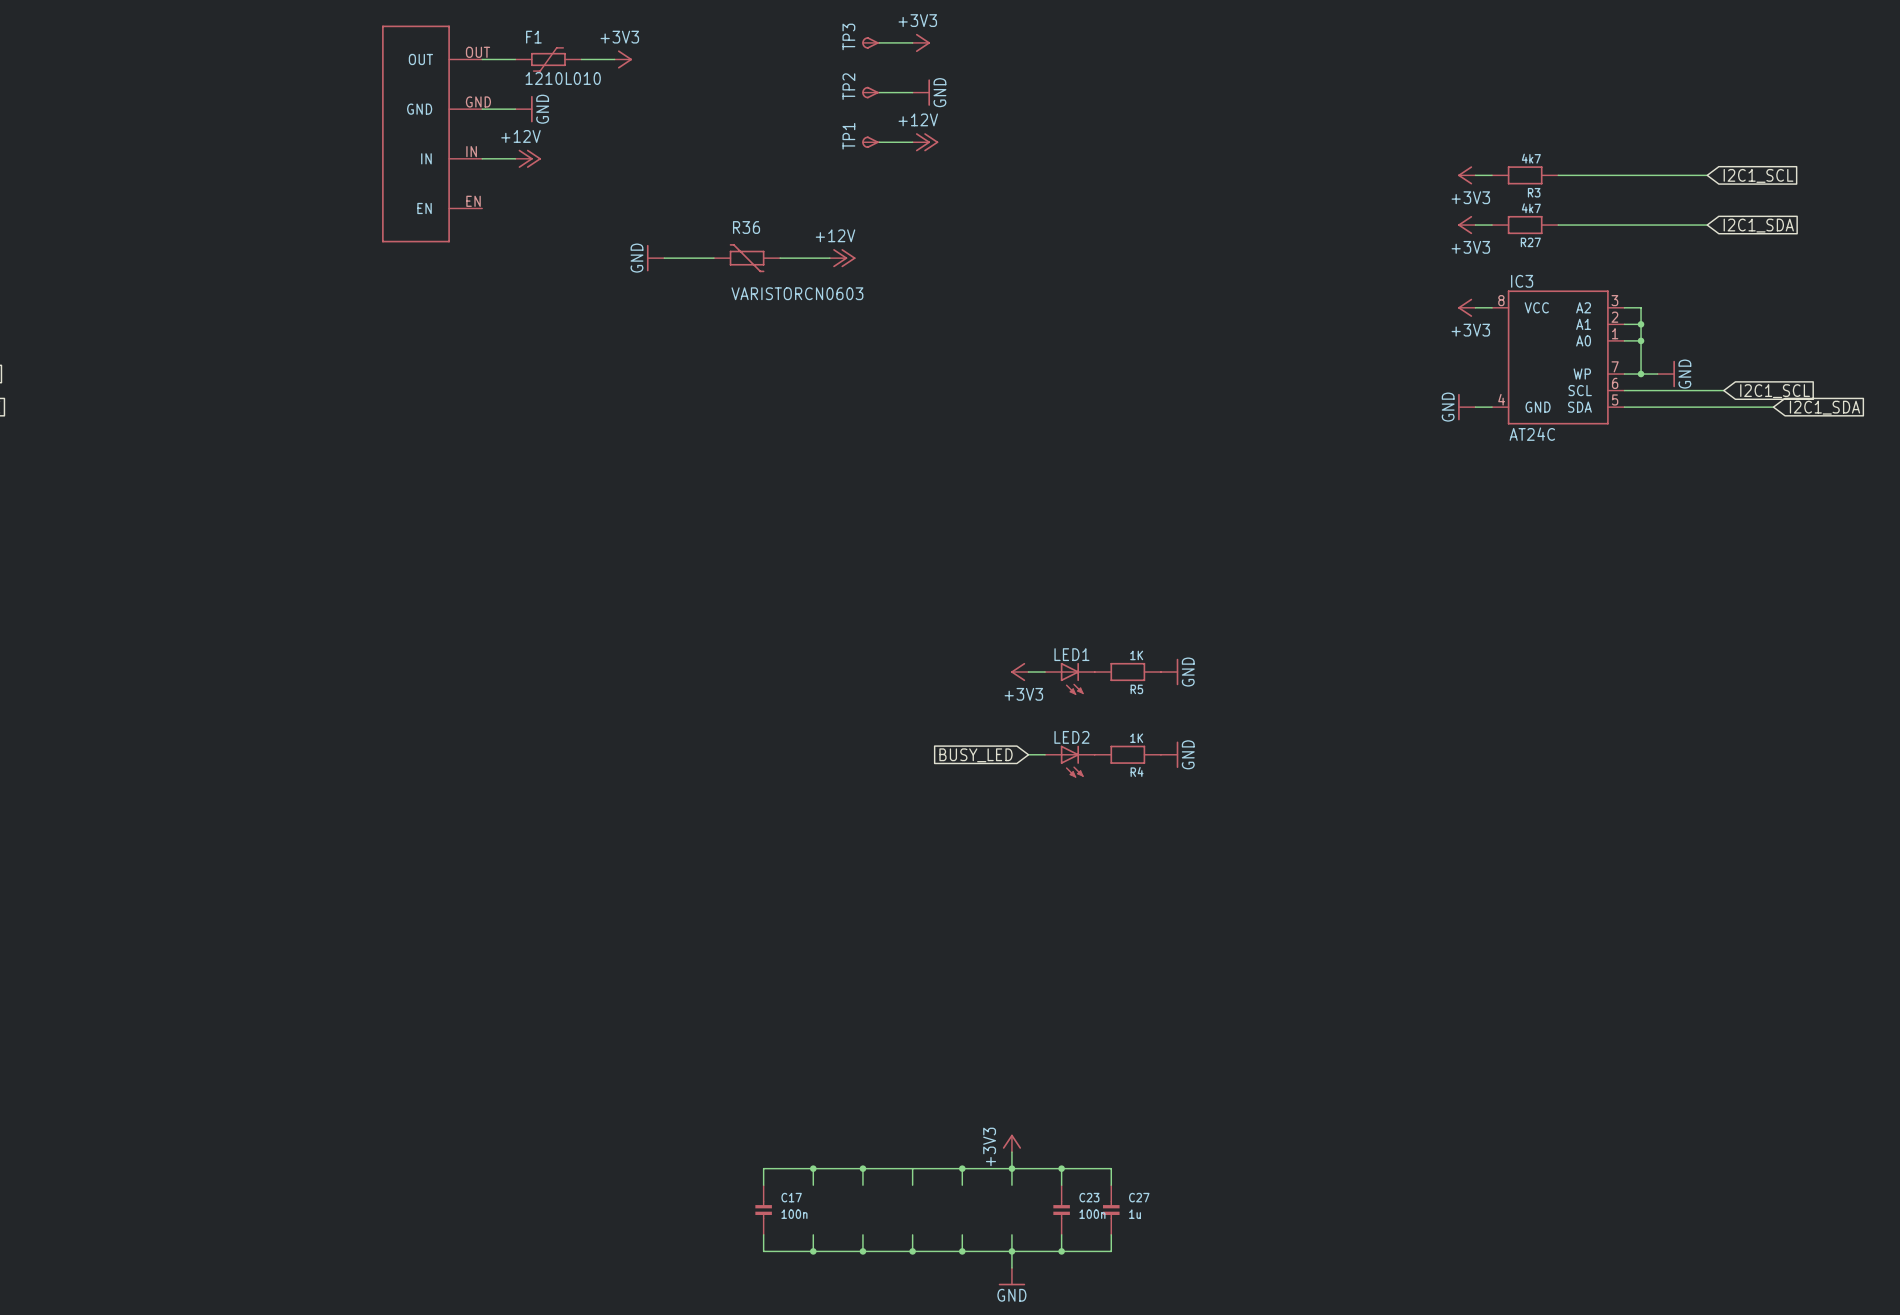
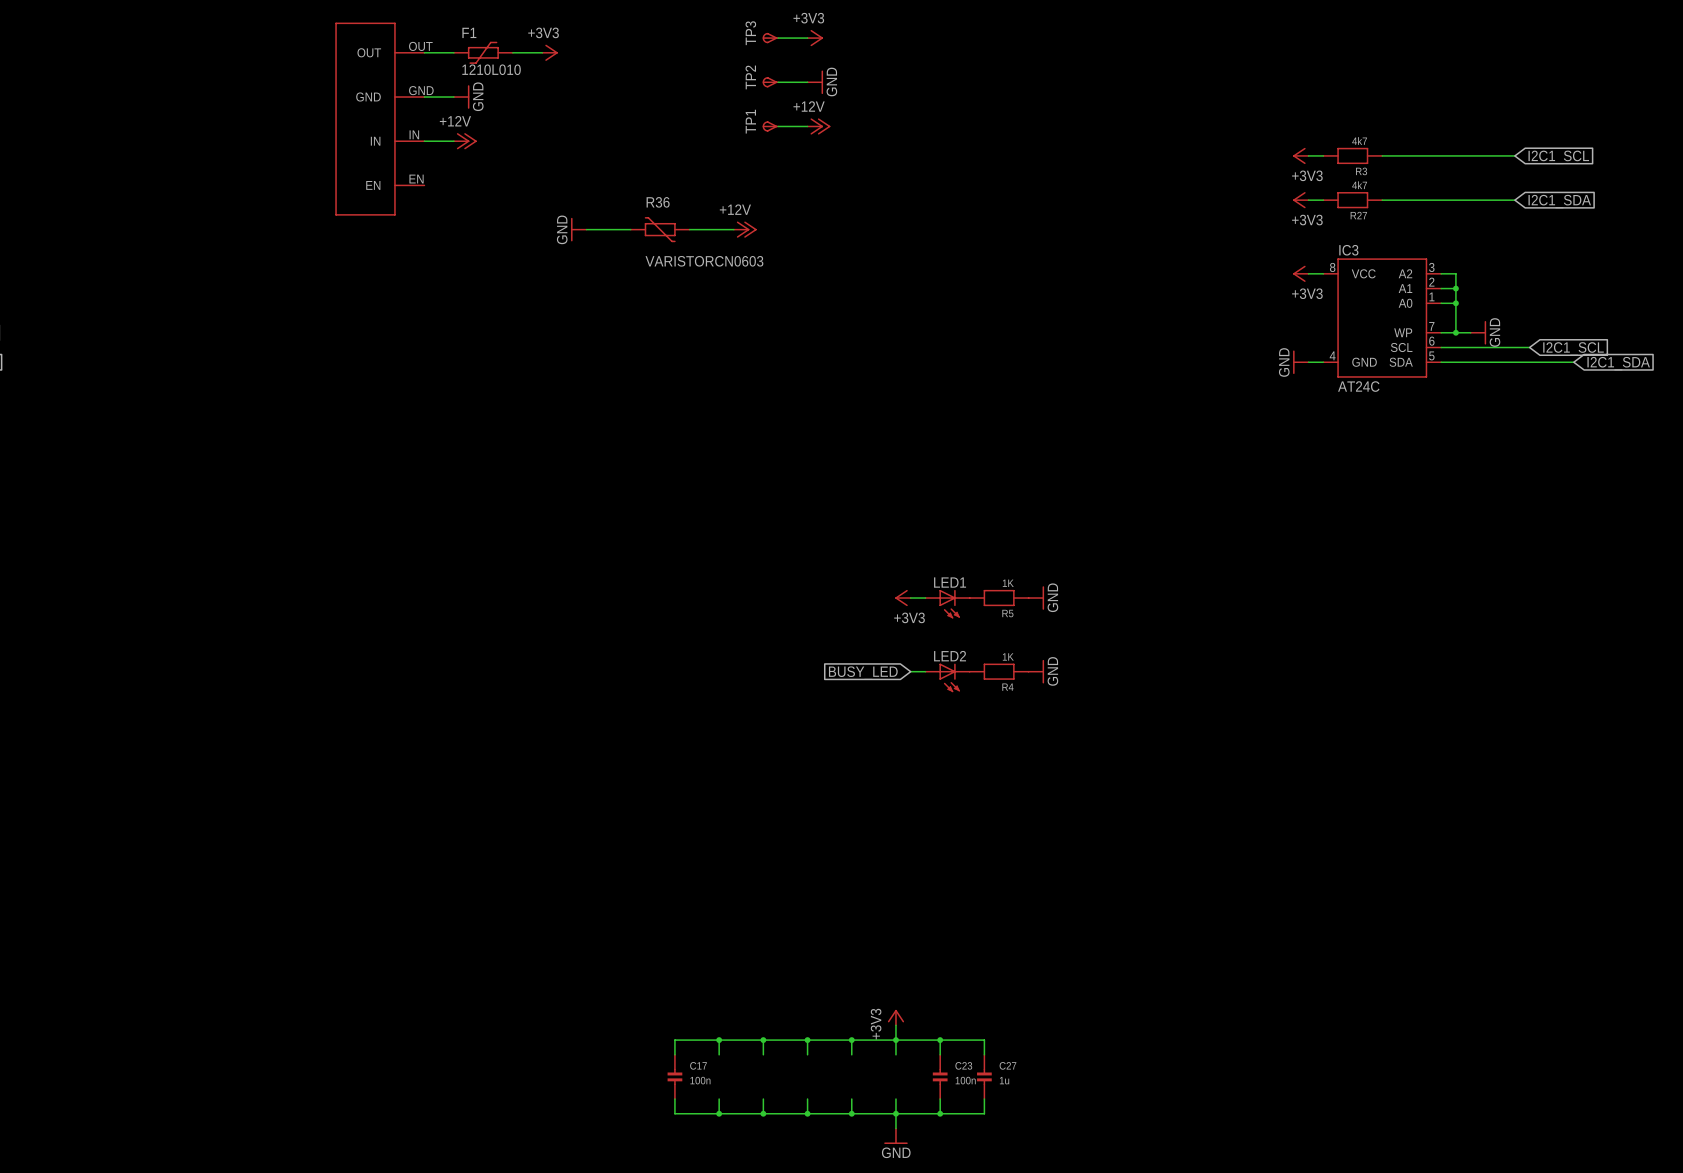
junction: none -> (807, 1040)

